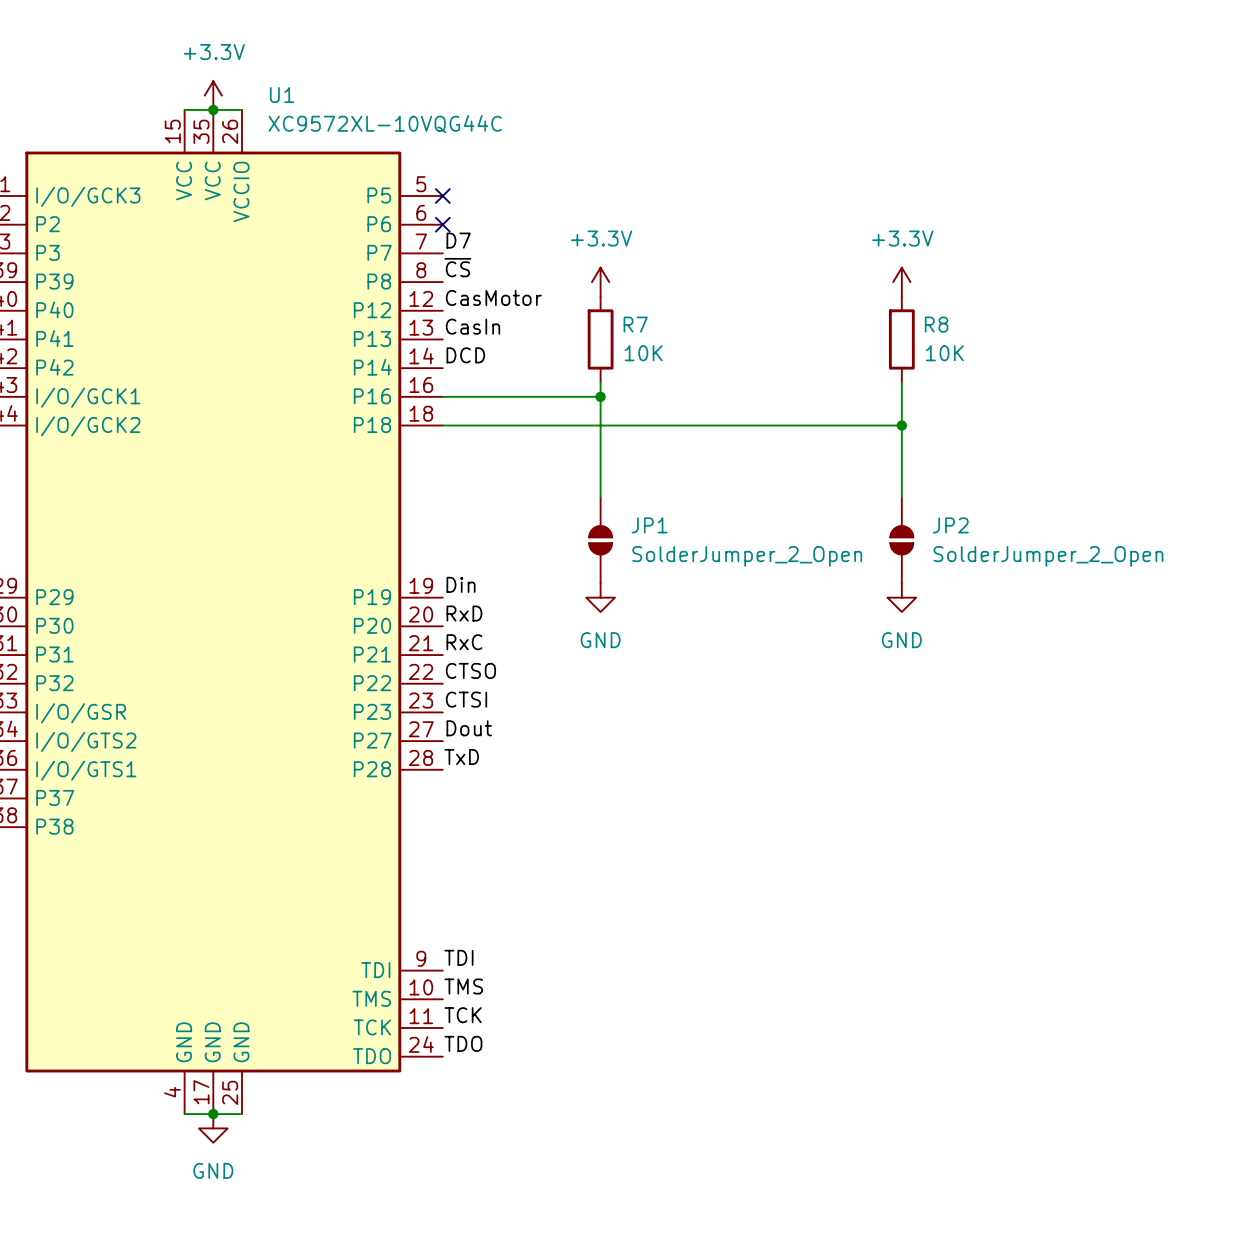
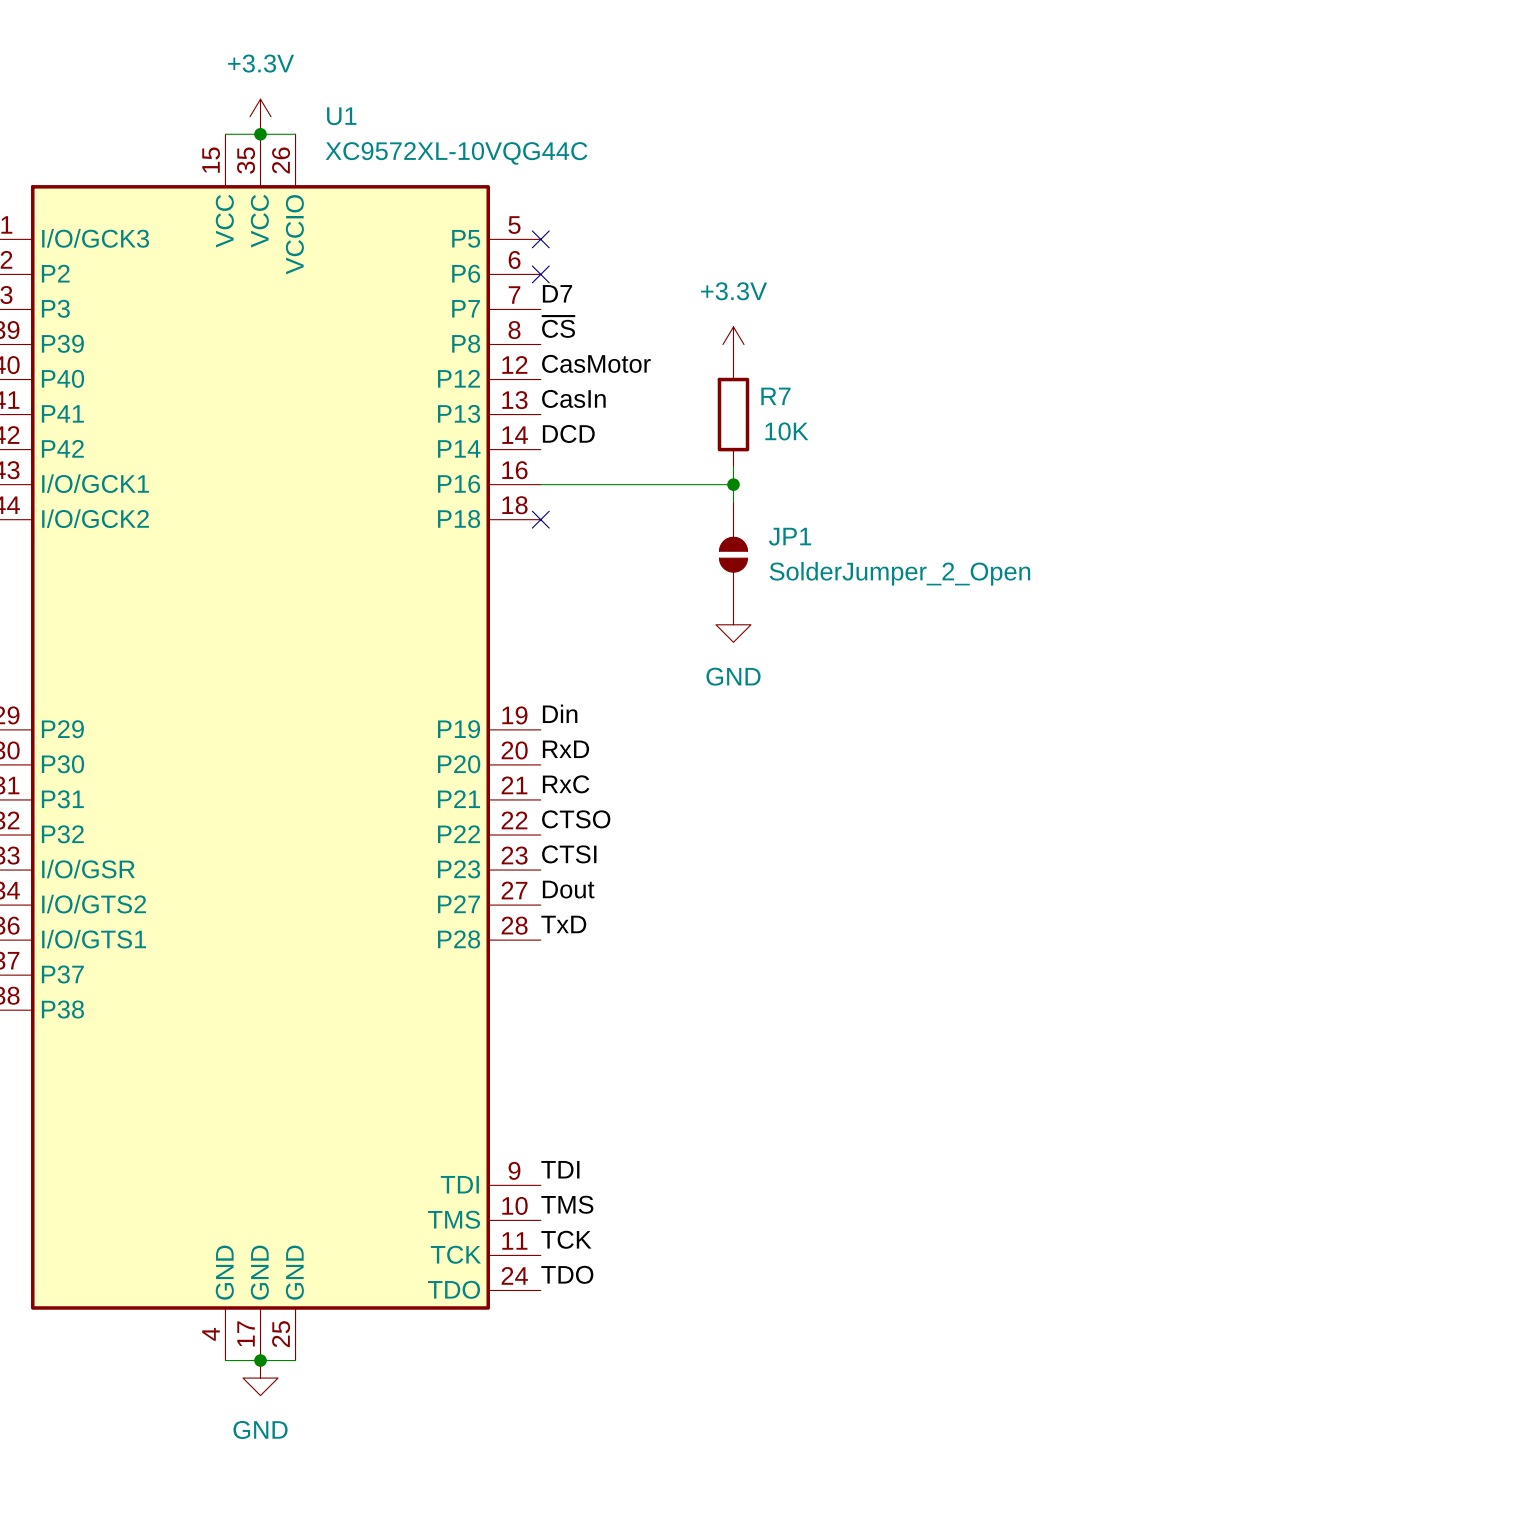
power symbol: +3.3V (901, 282) -> none
R8: 10K (901, 339) -> none
wire: (901, 382) (901, 497) -> none
wire: (442, 425) (901, 425) -> none
no-connect mark: none -> (540, 519)
junction: (901, 425) -> none
JP1 position: (600, 540) -> (733, 554)
JP2: SolderJumper_2_Open (901, 540) -> none
power symbol position: GND (600, 597) -> GND (733, 624)
power symbol: GND (901, 597) -> none

